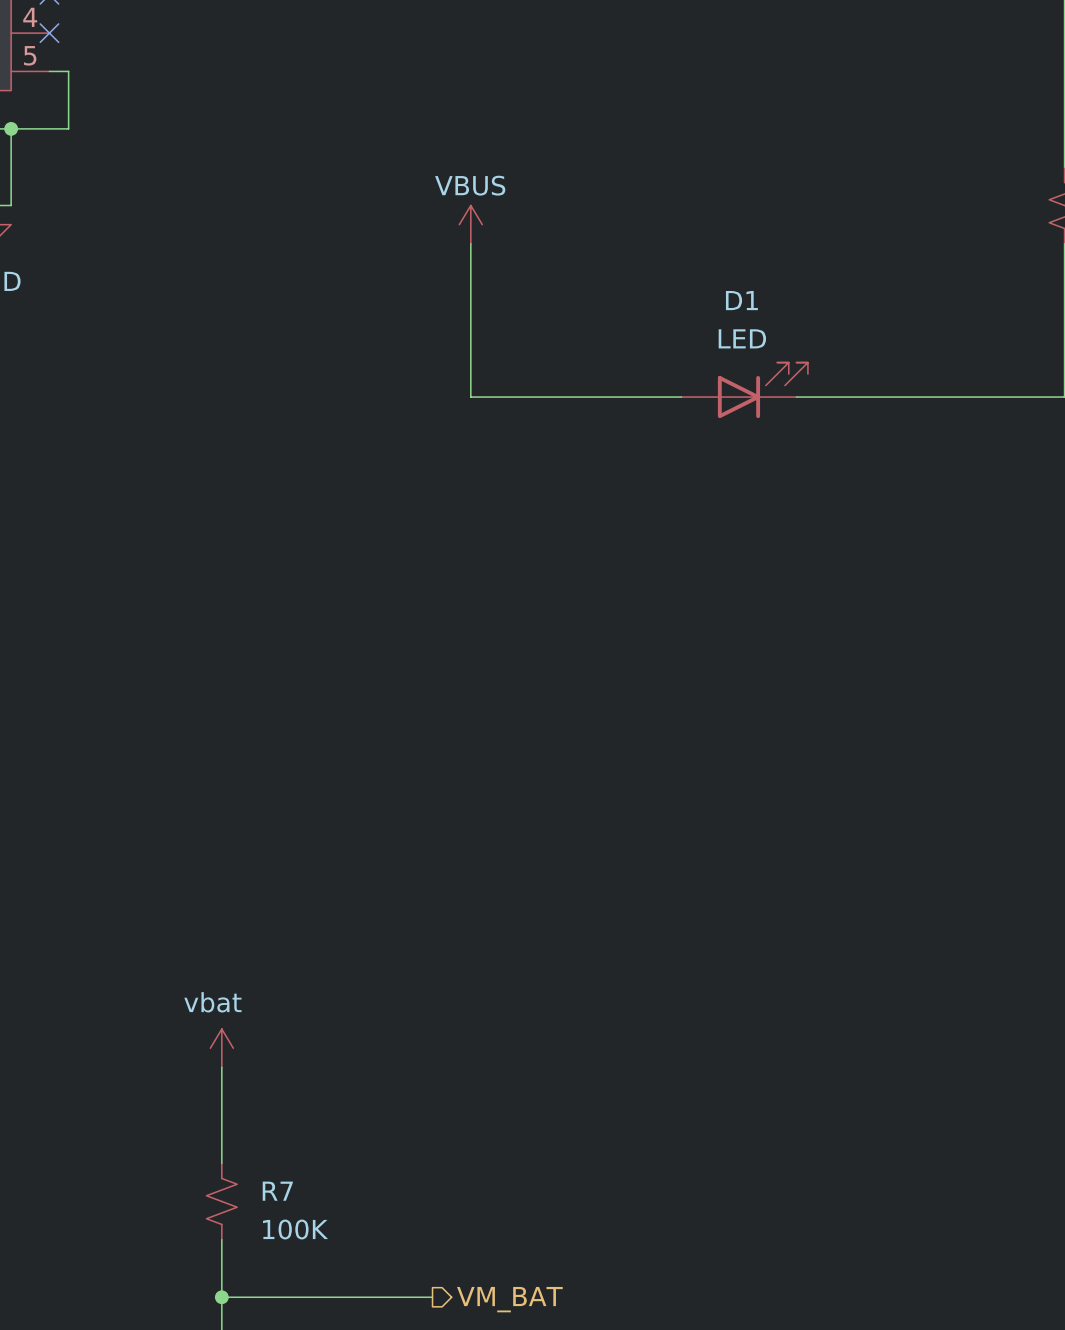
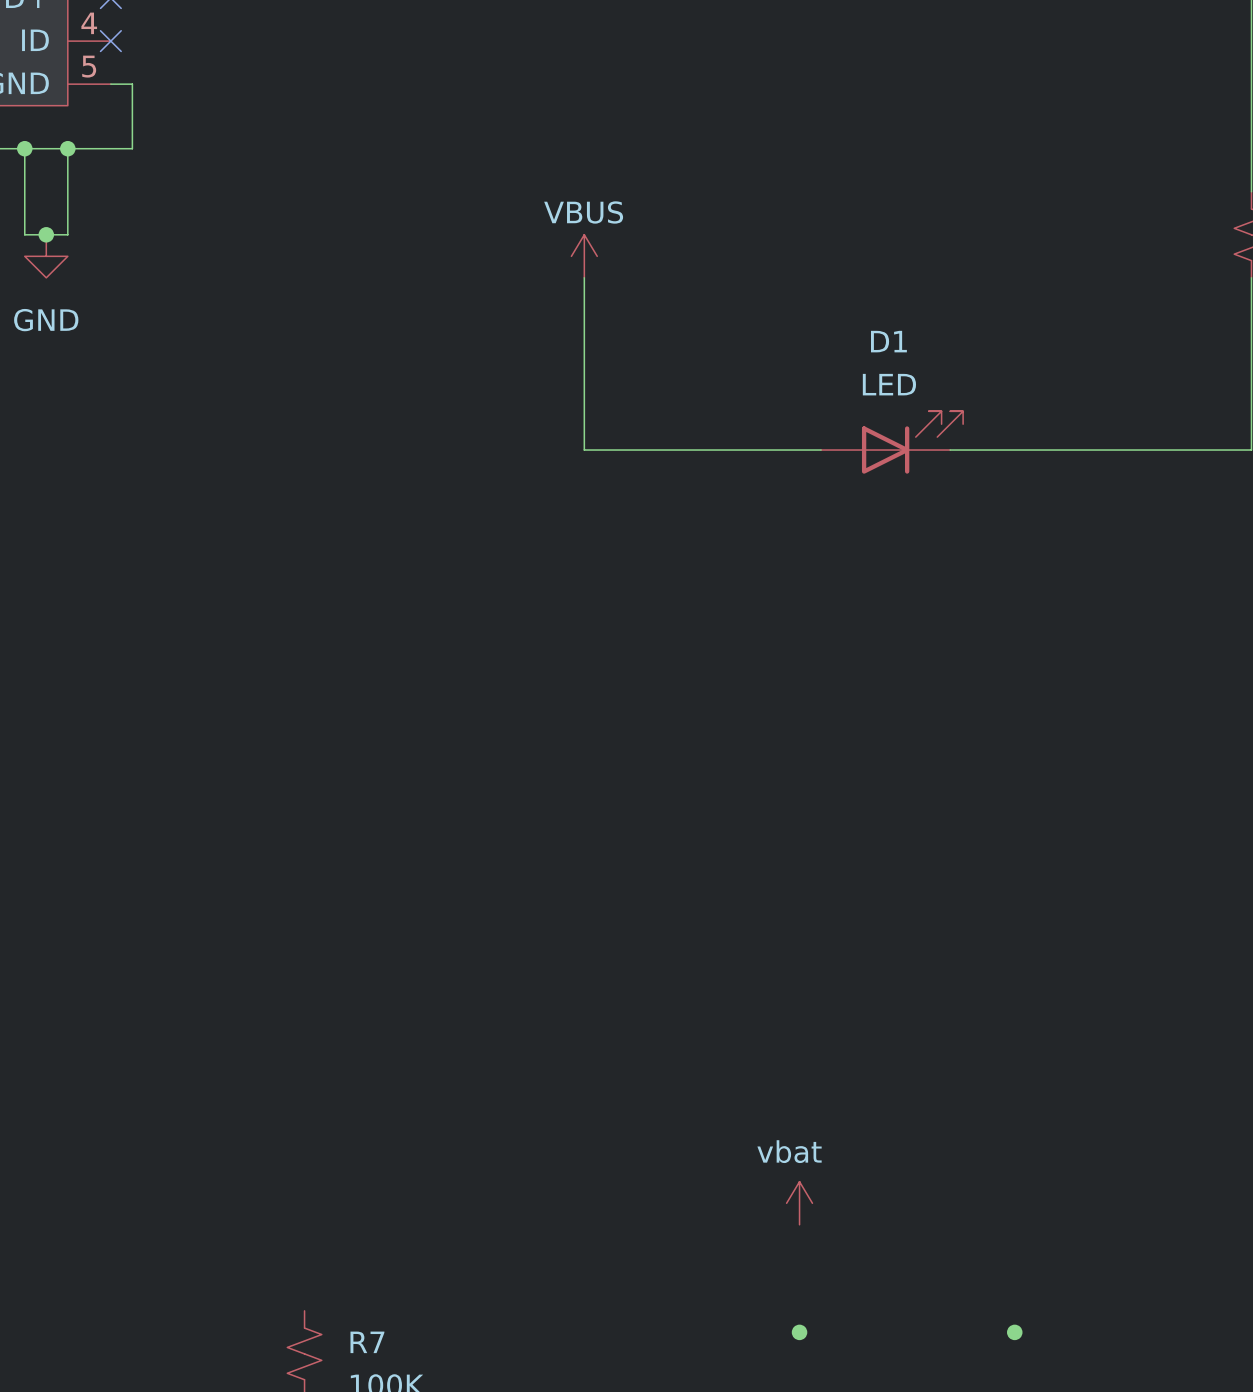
power symbol: vbat (221, 1048) -> none
wire: (221, 1067) (221, 1163) -> none
power symbol: none -> vbat (799, 1203)
junction: none -> (799, 1332)
junction: none -> (1014, 1332)

